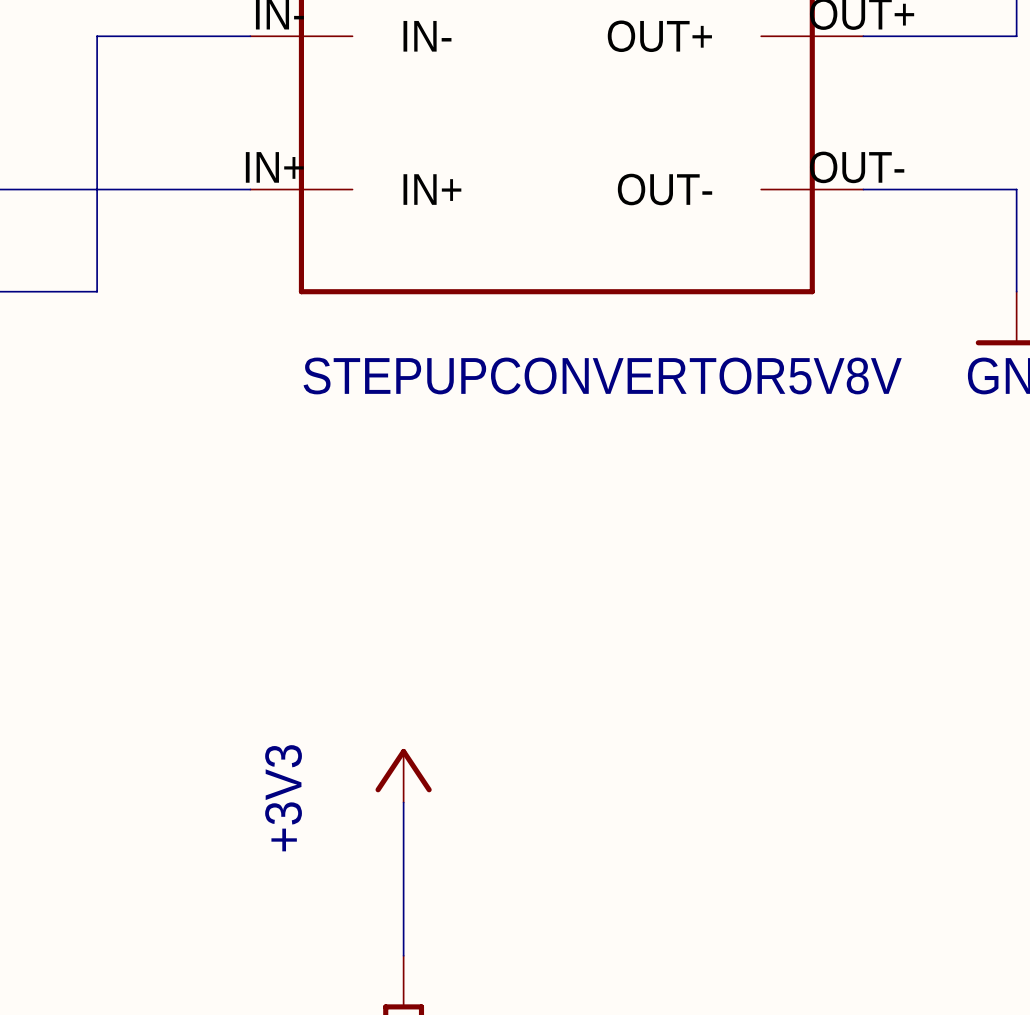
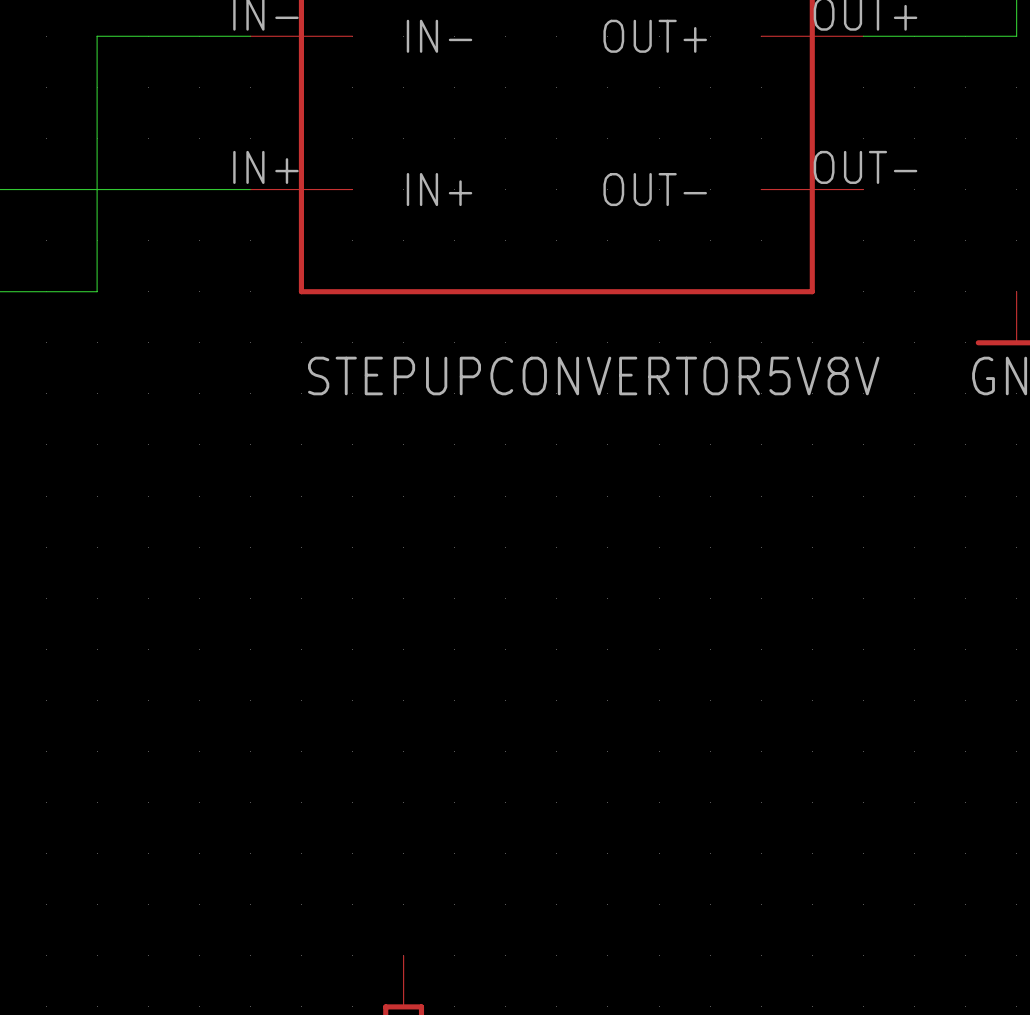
wire: (863, 189) (1016, 189) (1016, 291) -> none
power symbol: +3V3 (403, 775) -> none
wire: (403, 802) (403, 955) -> none

